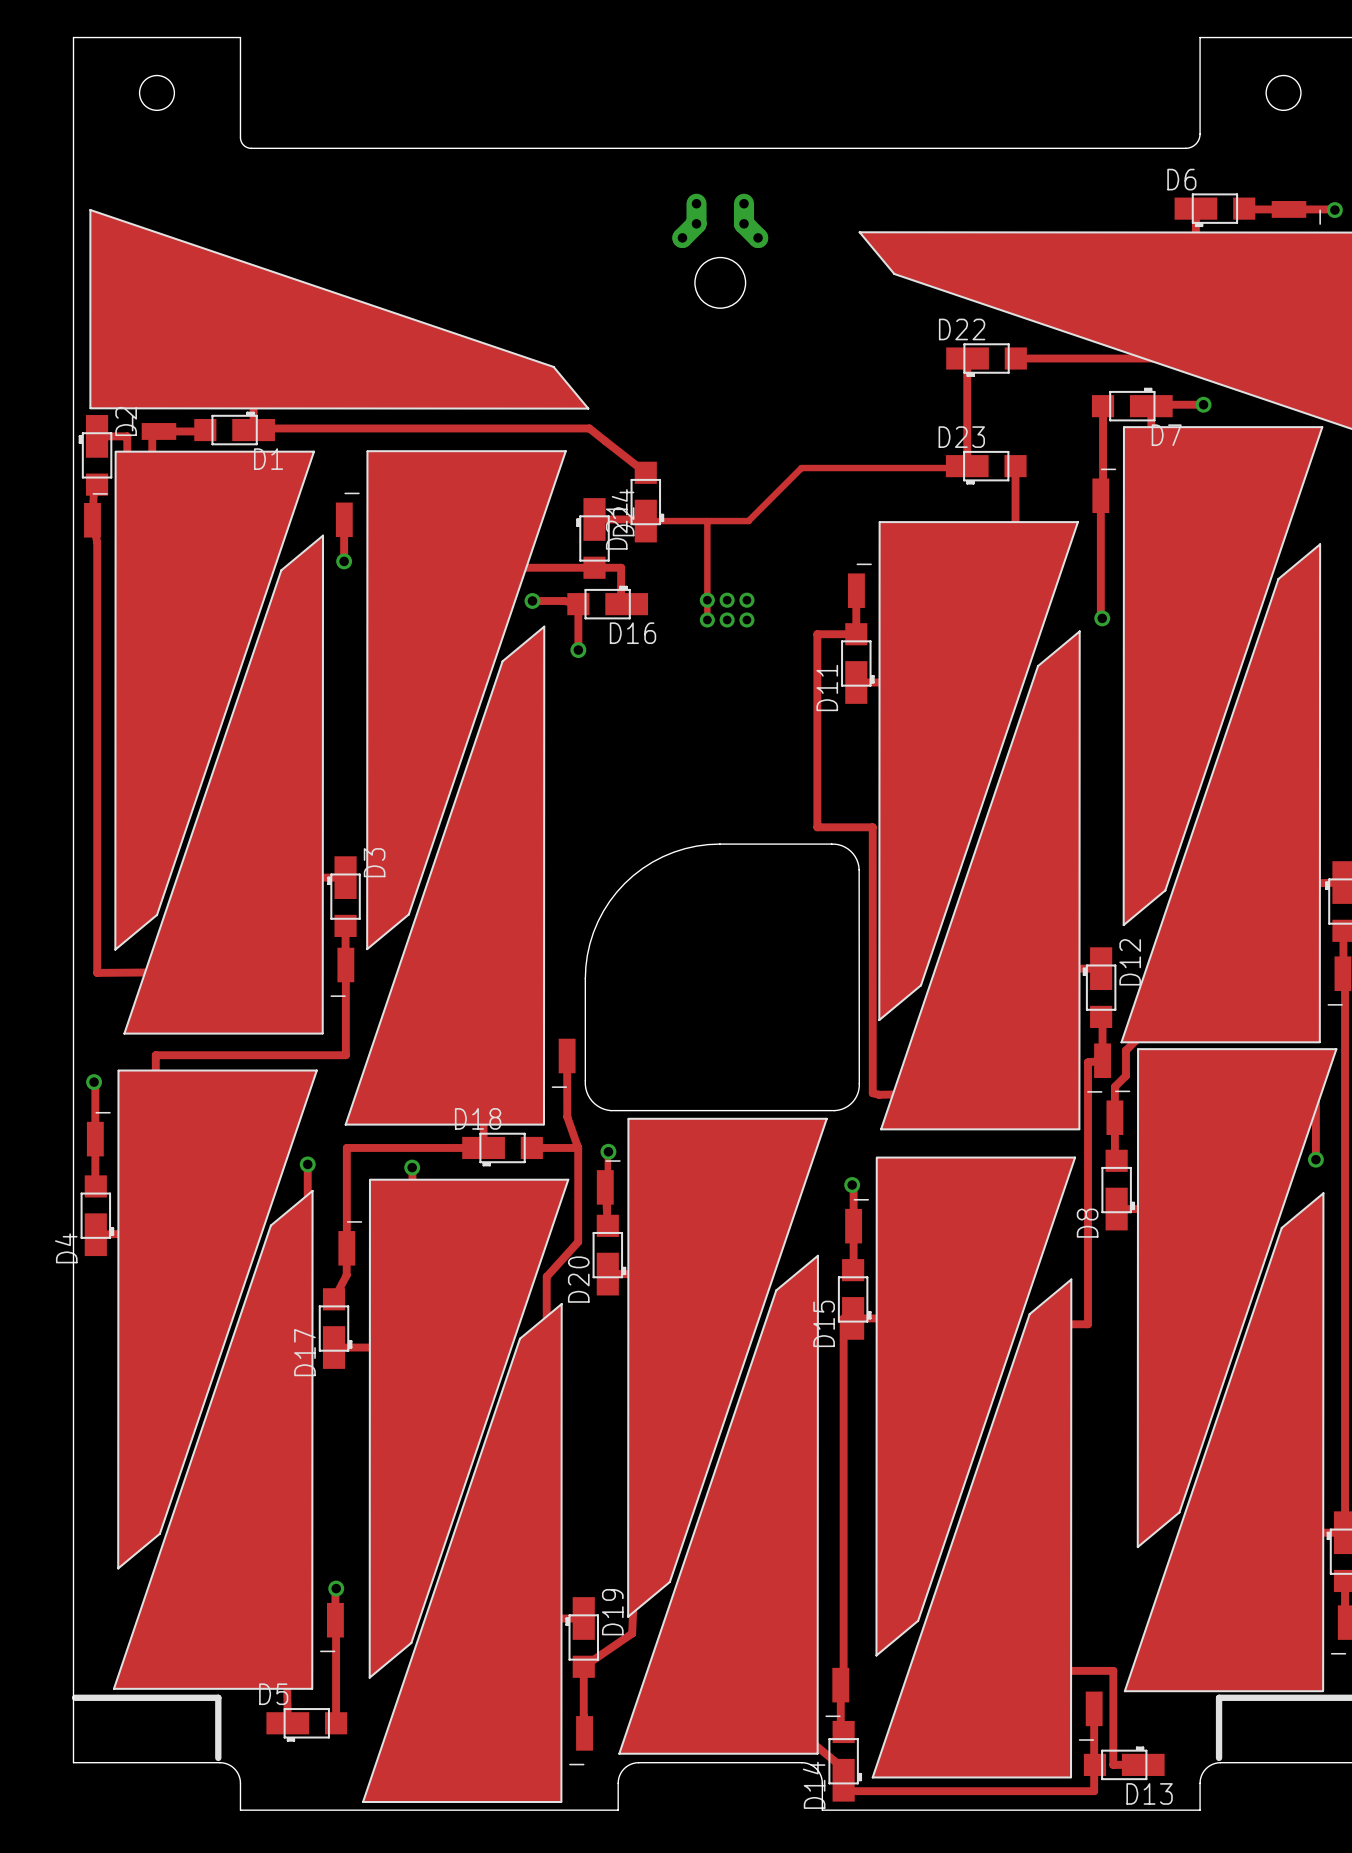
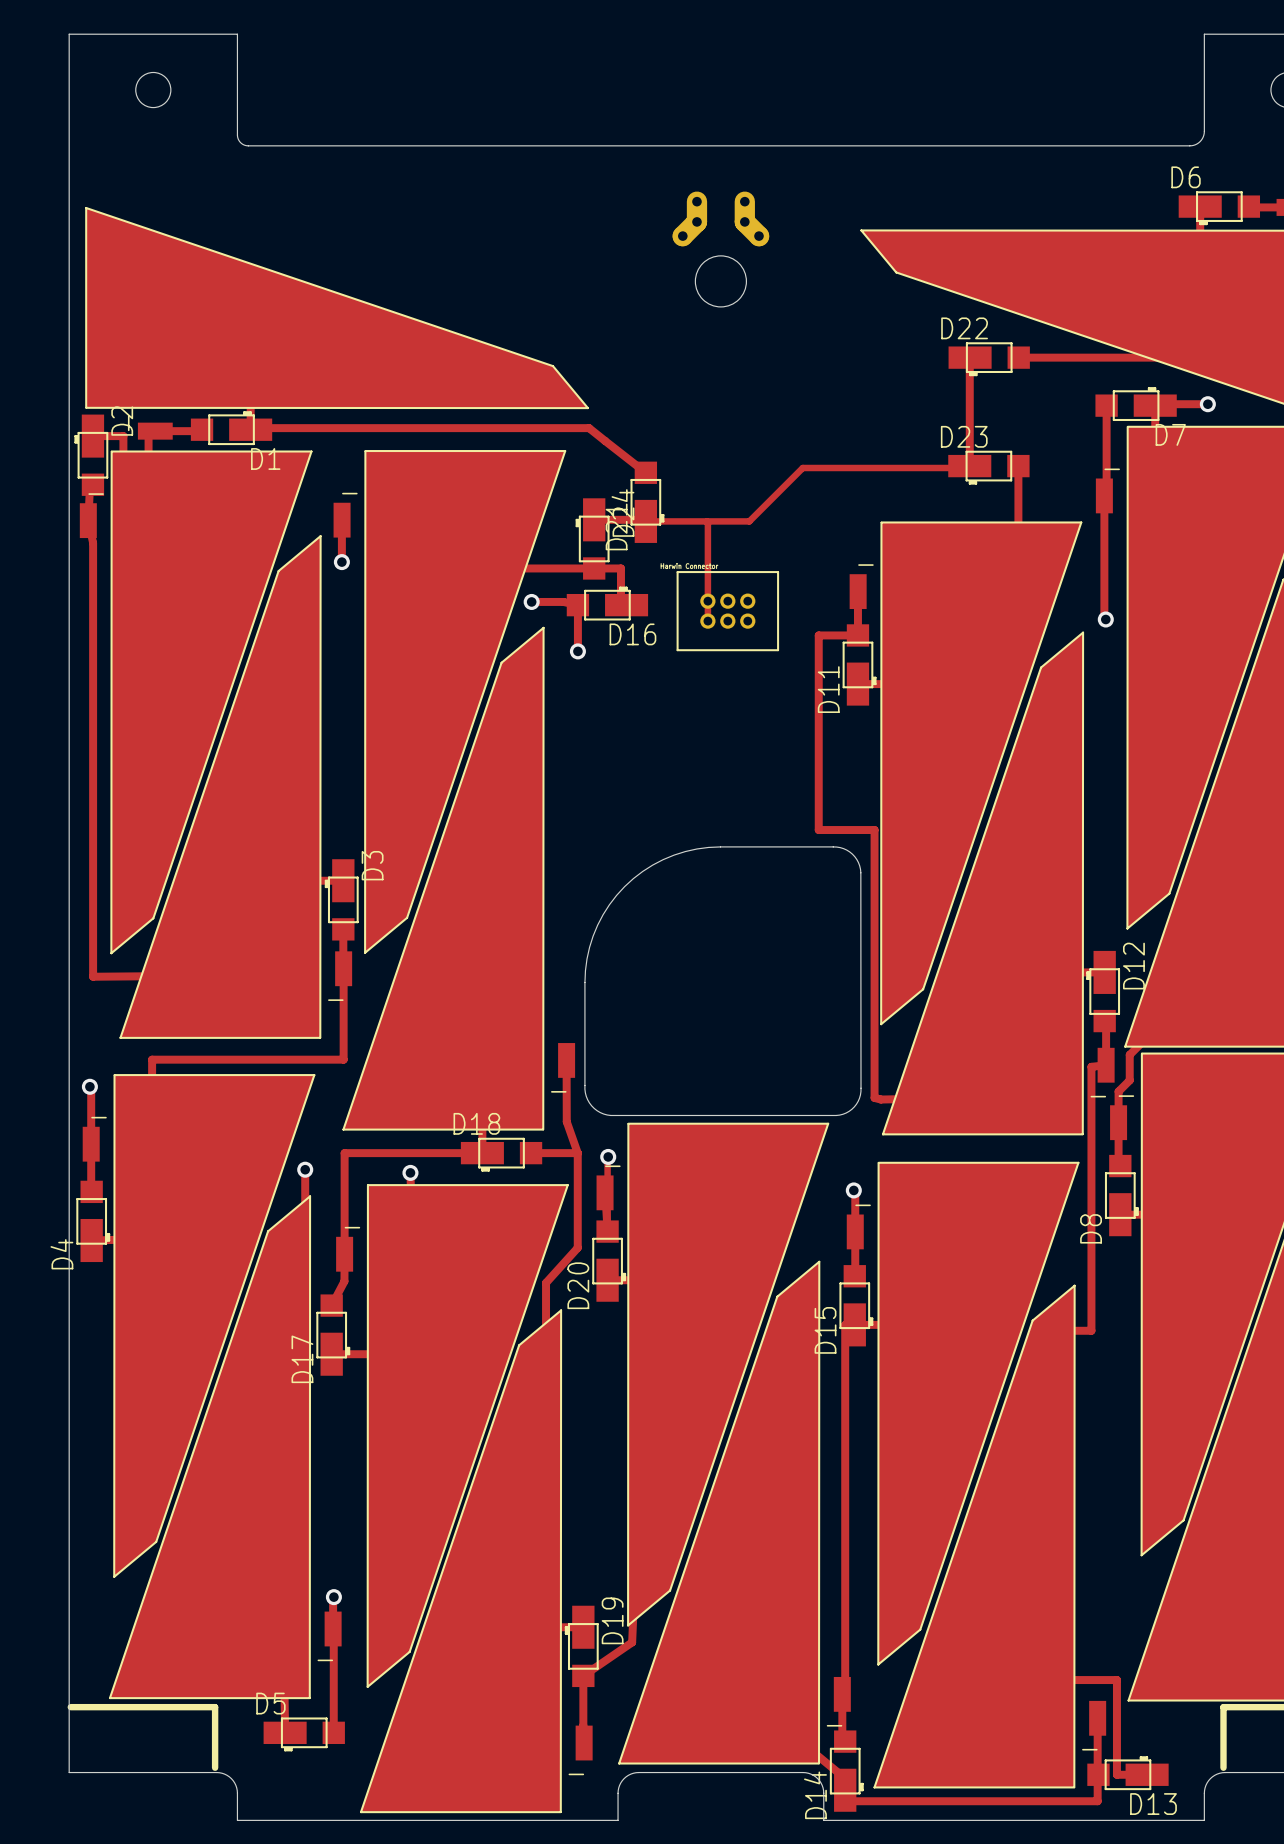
part side: bottom (727, 610) -> top (727, 611)

